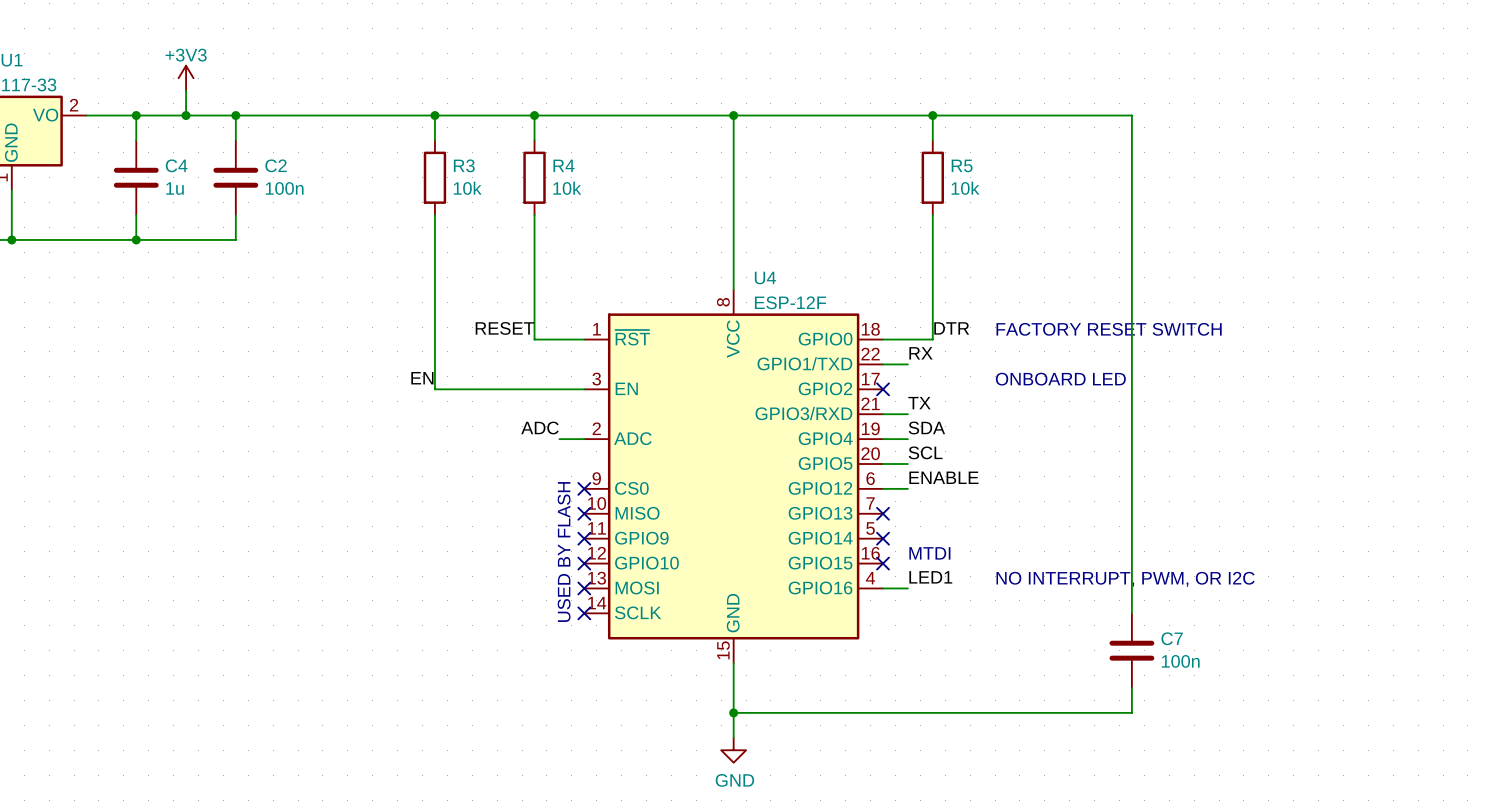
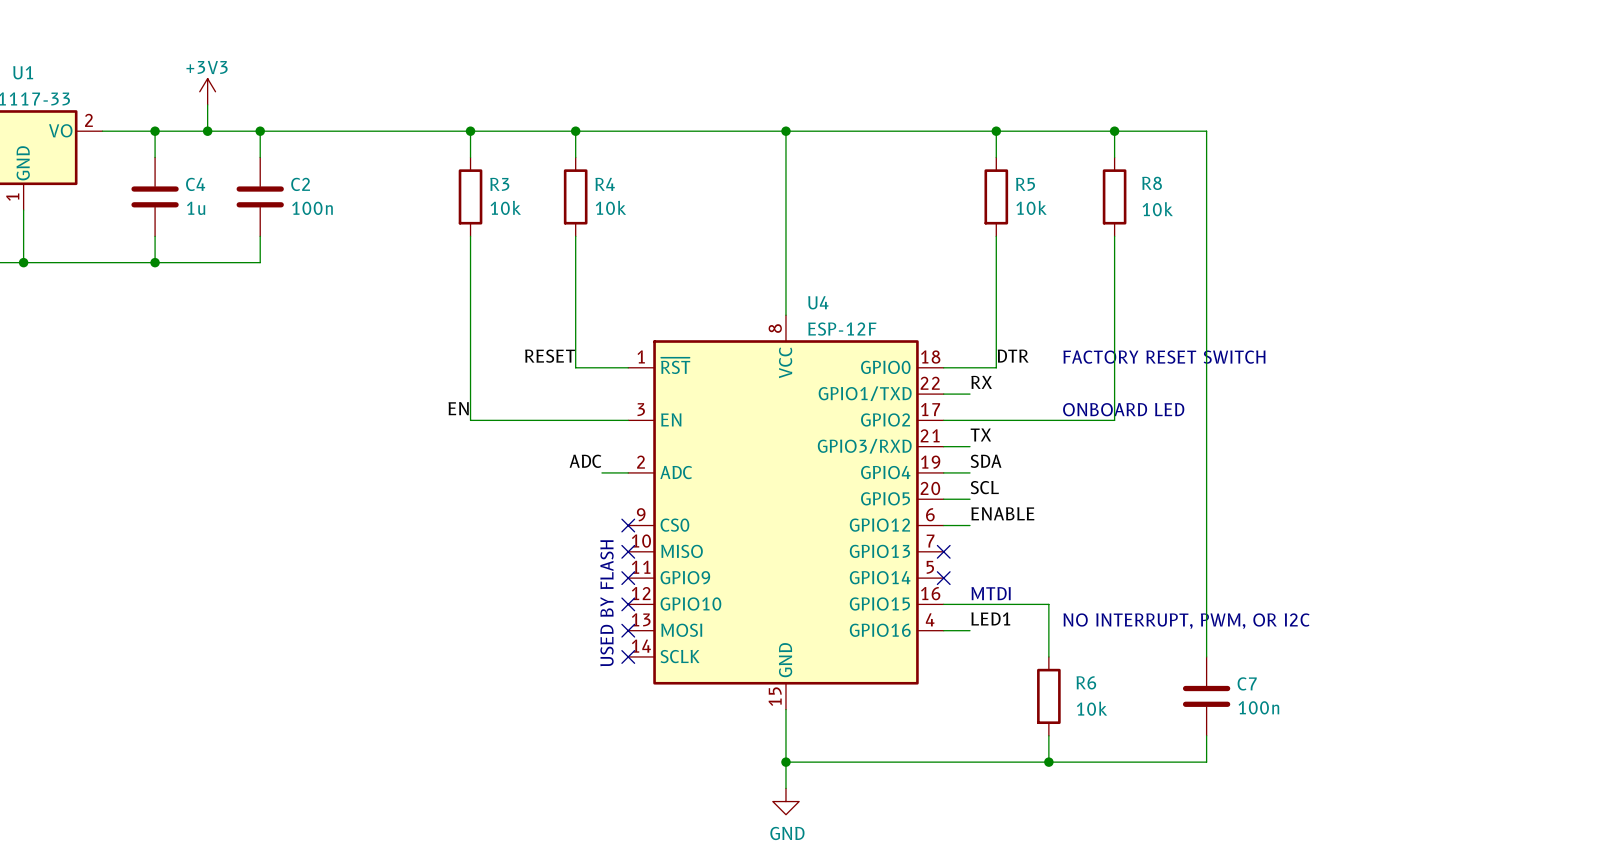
wire: none -> (1114, 131) (1114, 157)
junction: none -> (1114, 131)
R8: none -> 10k (1114, 196)
wire: none -> (1114, 236) (1114, 420) (943, 420)
no-connect mark: (883, 389) -> none
wire: none -> (943, 604) (1048, 604) (1048, 656)
no-connect mark: (883, 563) -> none
R6: none -> 10k (1048, 696)
wire: none -> (1048, 735) (1048, 762)
junction: none -> (1048, 762)

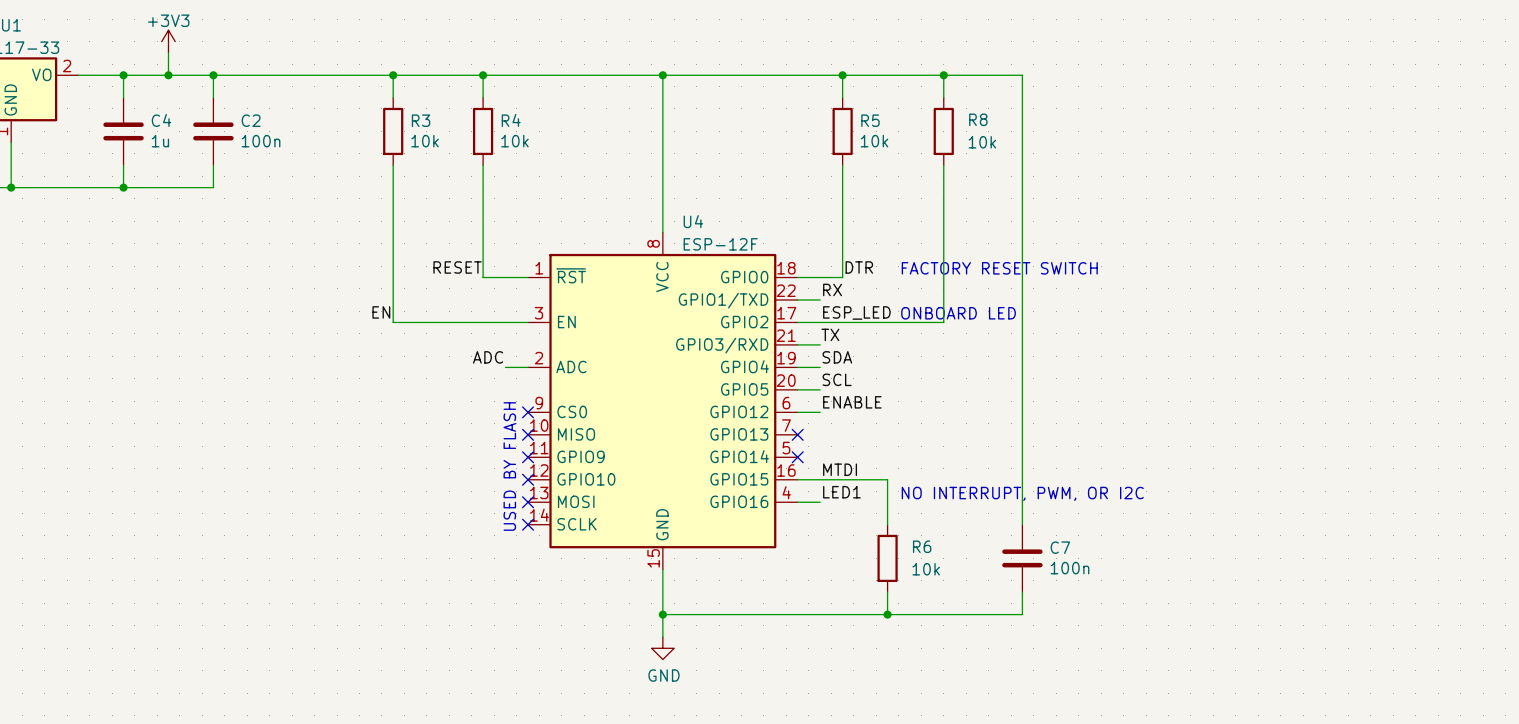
label: none -> ESP_LED (856, 312)
label: none -> MTDI (840, 469)
text: MTDI (991, 593) -> none

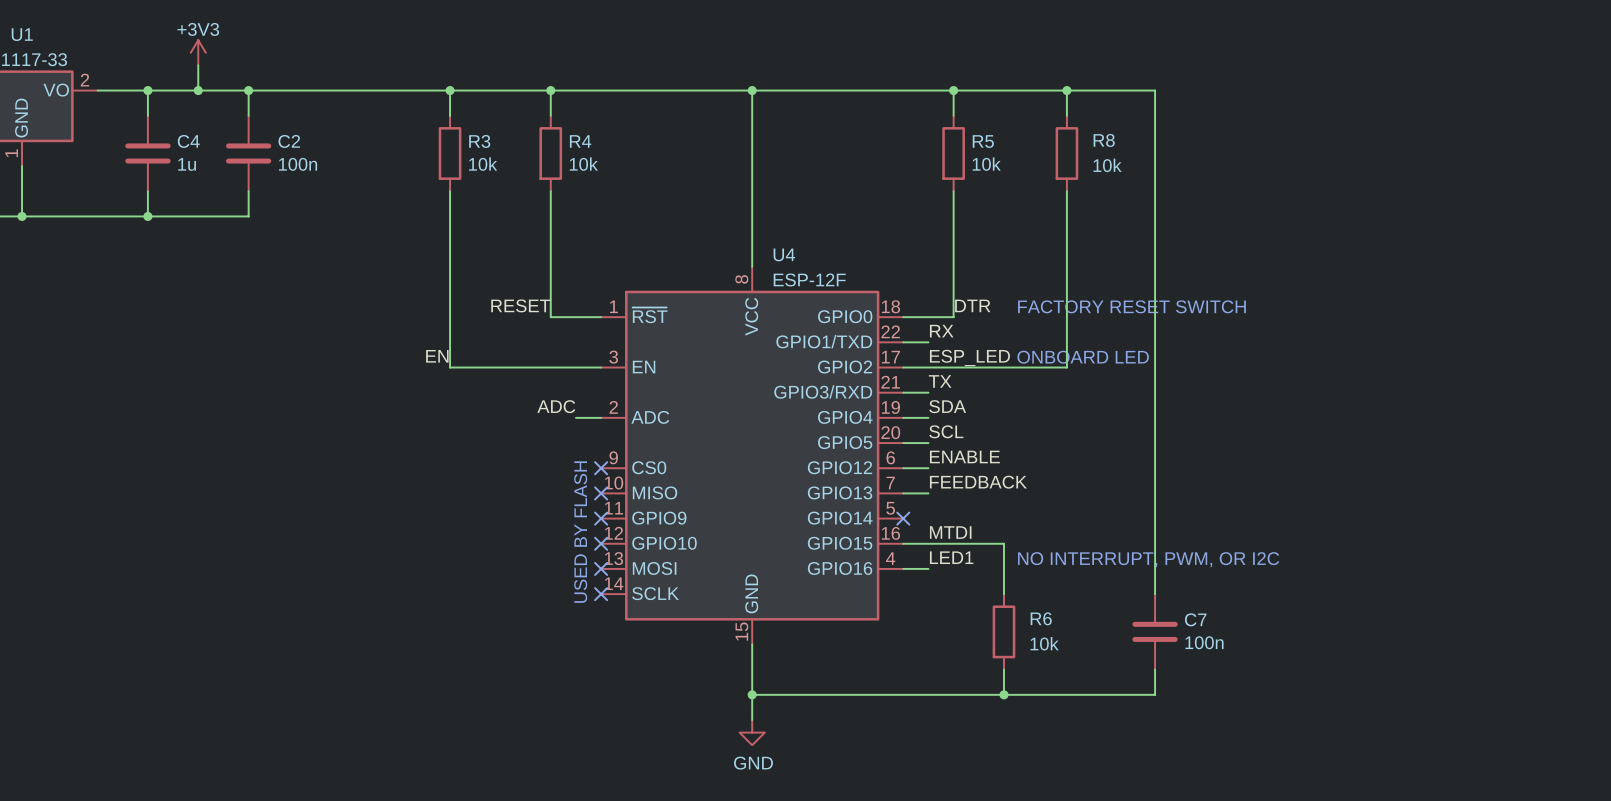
label: none -> FEEDBACK (978, 482)
wire: none -> (903, 493) (928, 493)
no-connect mark: (797, 434) -> none

